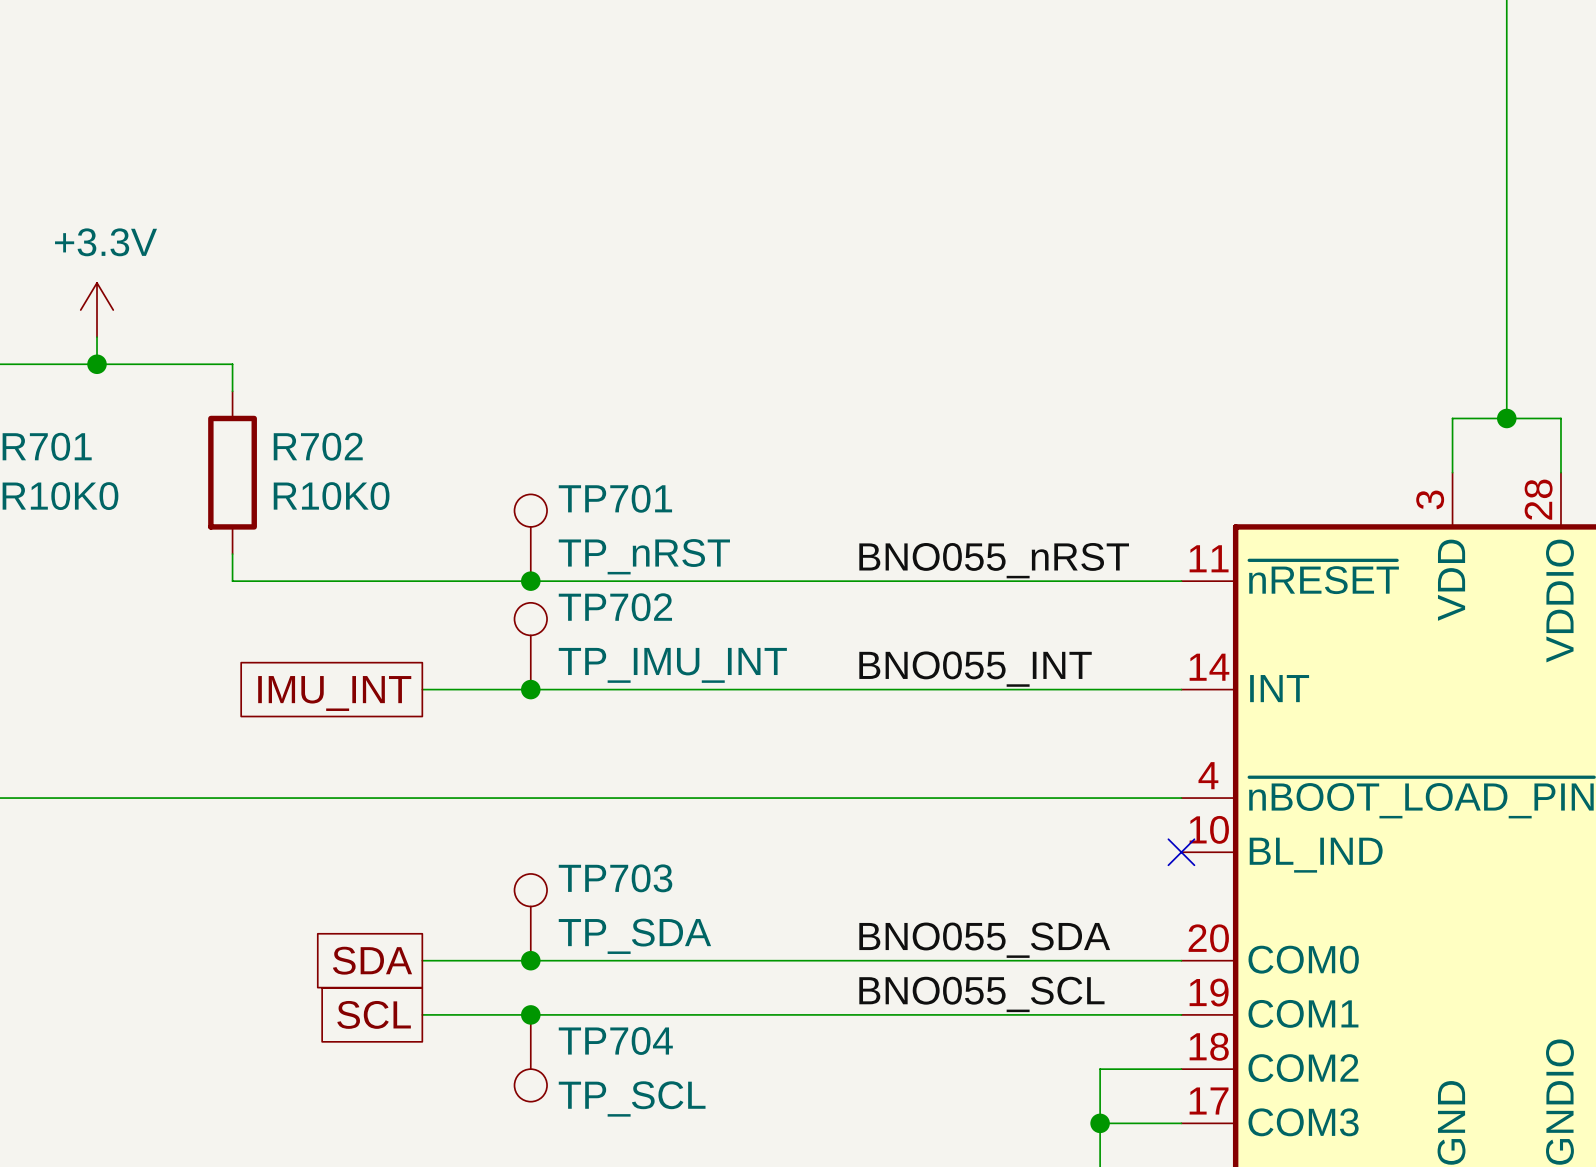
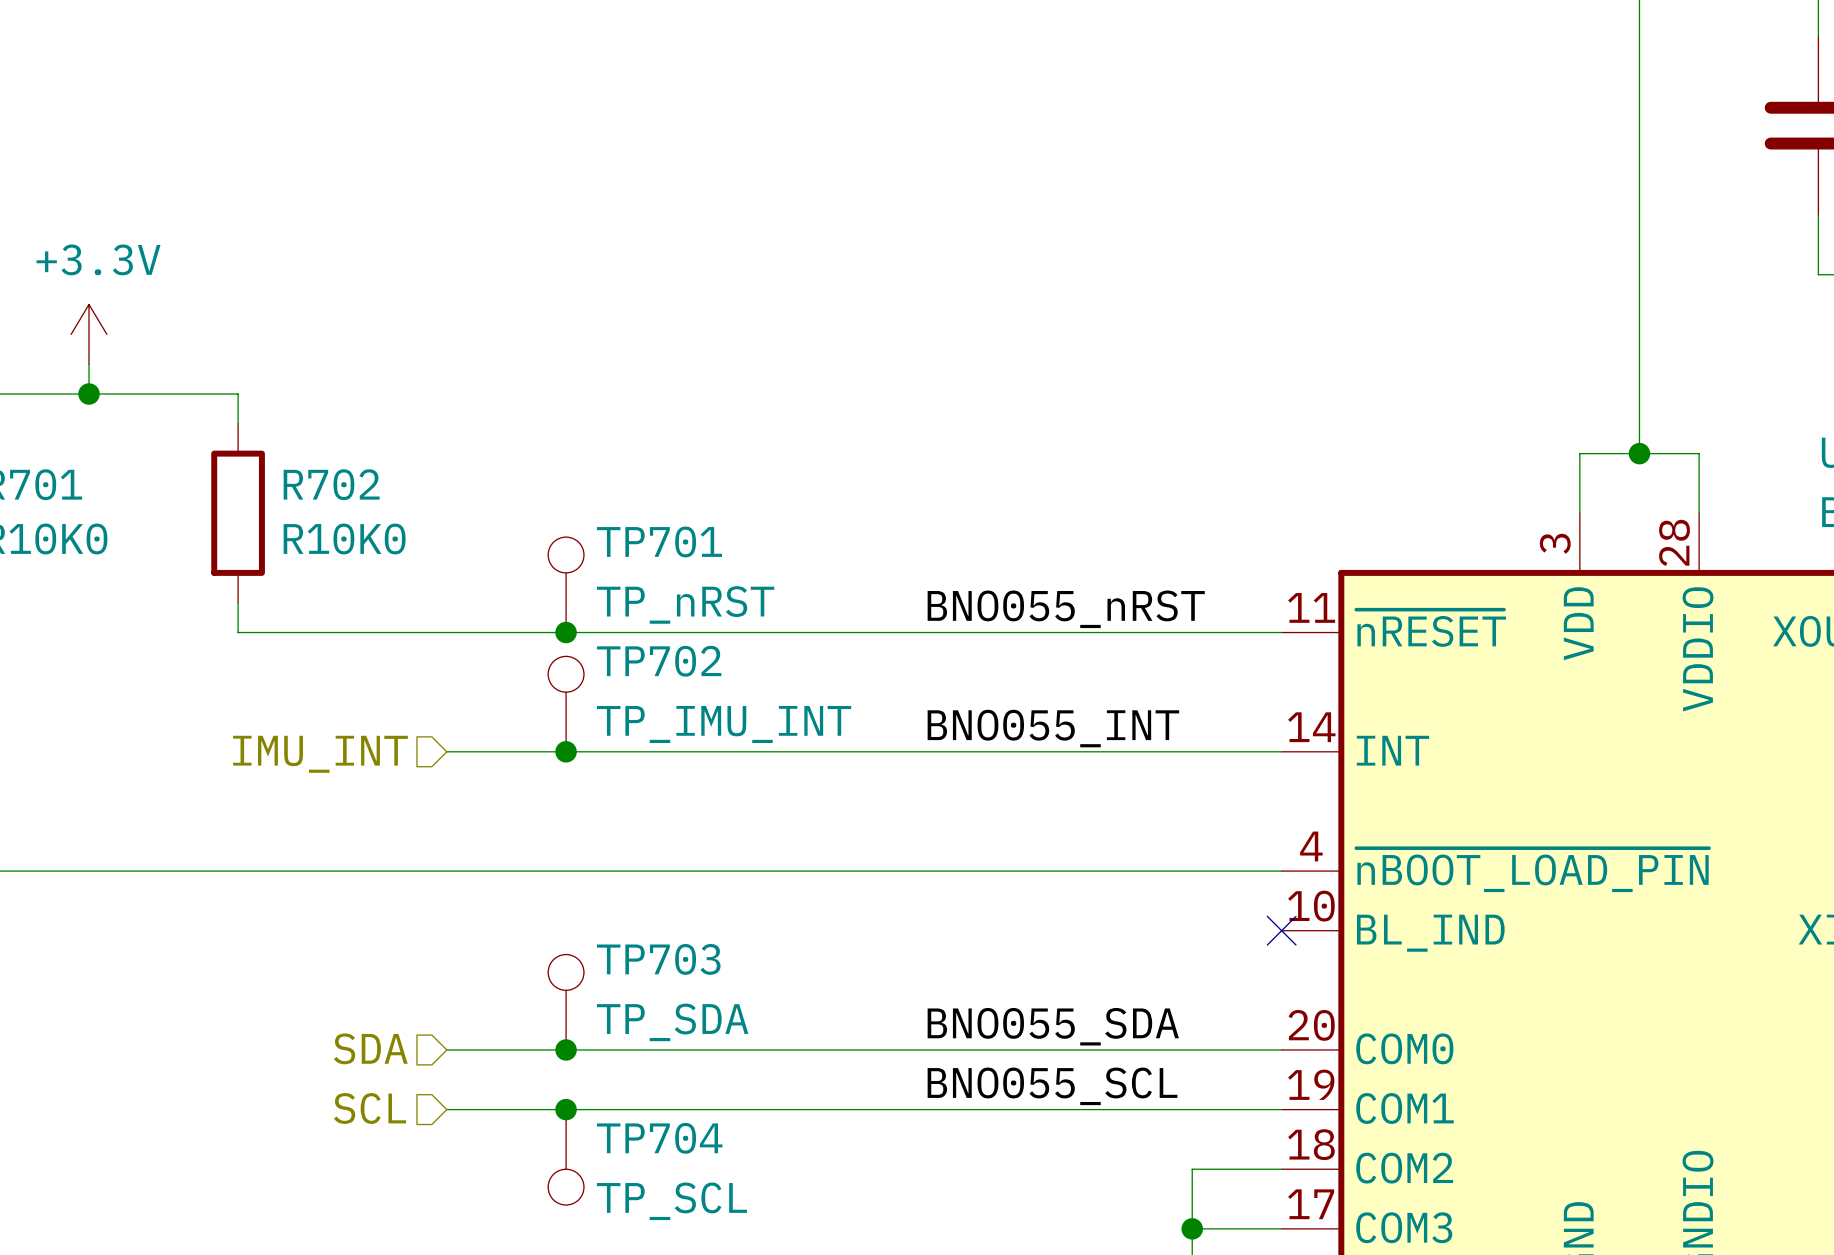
hierarchical label: none -> IMU_INT (320, 754)
global label: IMU_INT (334, 693) -> none
hierarchical label: none -> SDA (370, 1048)
global label: SDA (372, 960) -> none
hierarchical label: none -> SCL (370, 1108)
global label: SCL (374, 1014) -> none

